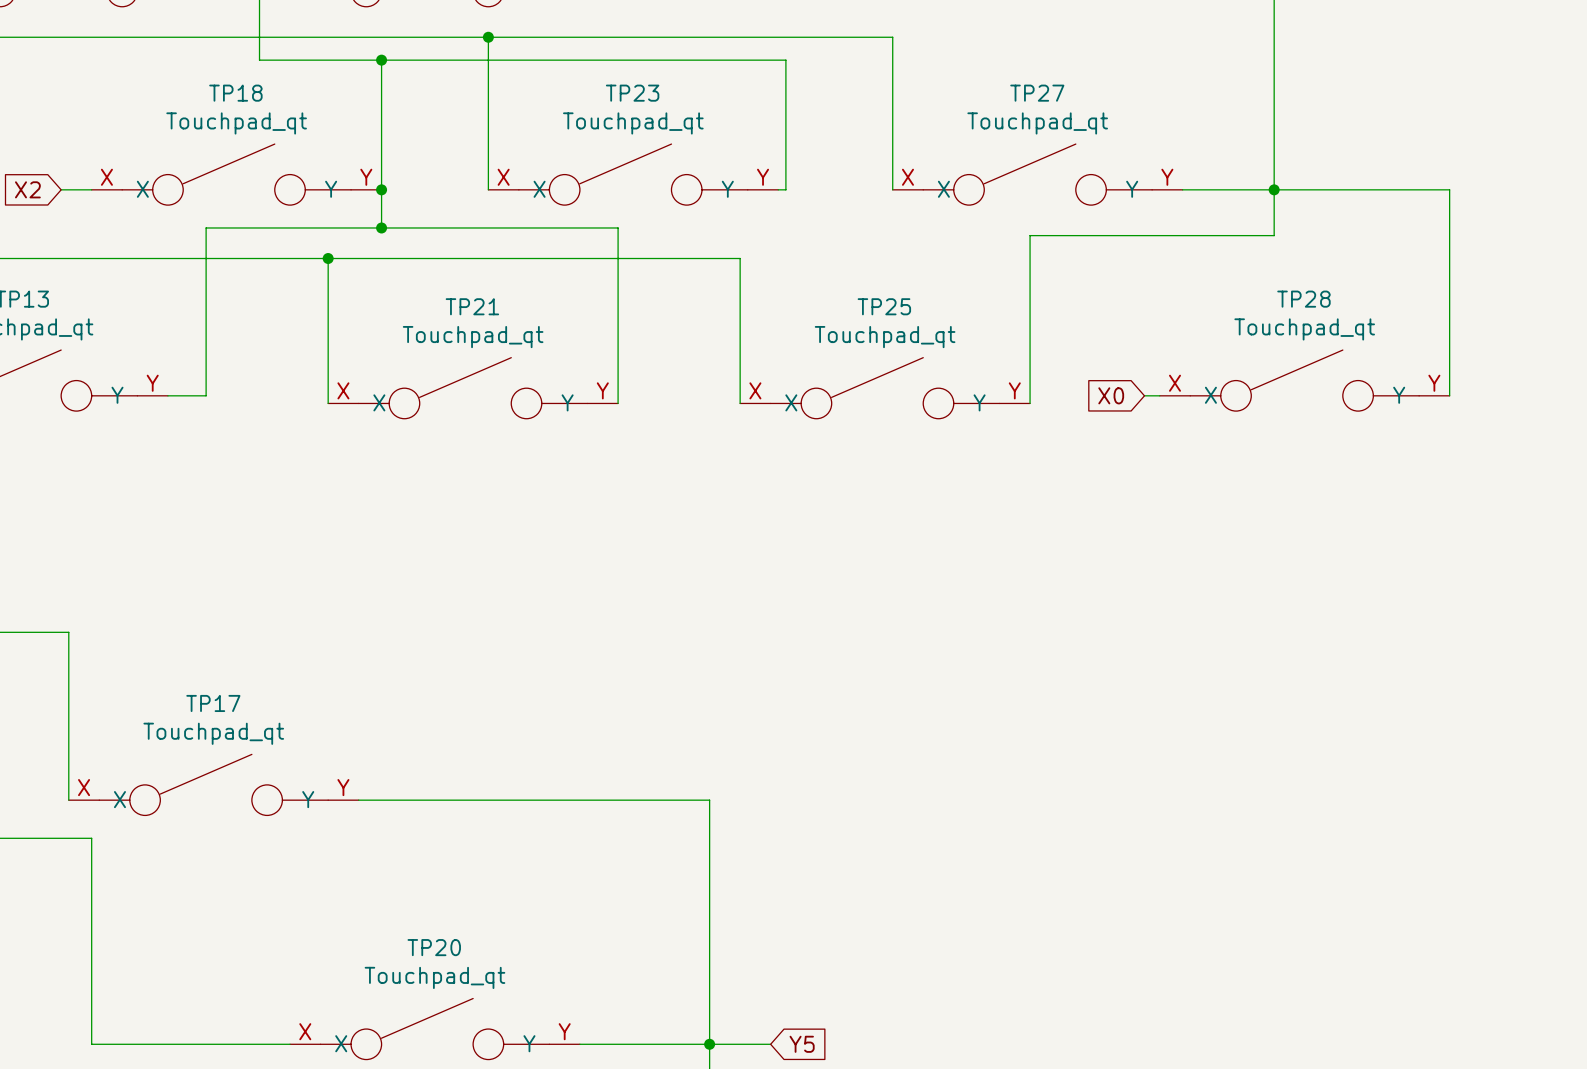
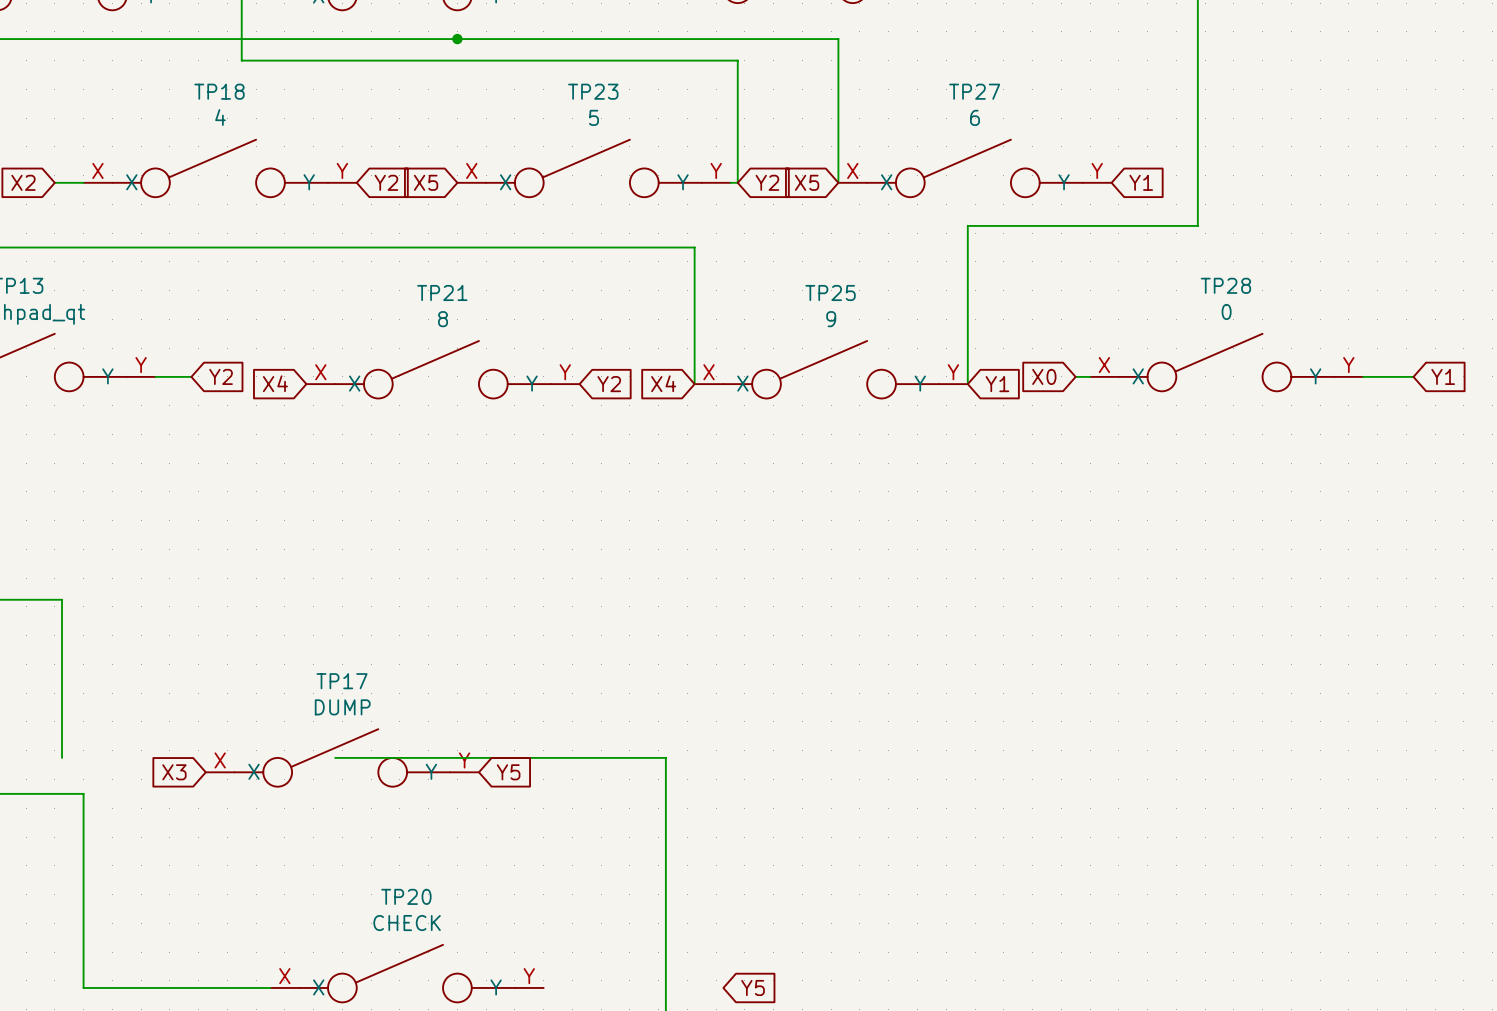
wire: (488, 37) (488, 189) -> none
wire: (381, 60) (381, 227) -> none
junction: (381, 60) -> none
TP18 value: Touchpad_qt (236, 123) -> 4 (220, 117)
TP23 value: Touchpad_qt (633, 123) -> 5 (593, 117)
TP27 value: Touchpad_qt (1037, 123) -> 6 (975, 117)
junction: (381, 189) -> none
global label: none -> Y2 (386, 182)
global label: none -> X5 (426, 182)
global label: none -> Y2 (767, 182)
global label: none -> X5 (807, 182)
wire: (1182, 189) (1449, 189) (1449, 395) -> (1413, 376) (1363, 376)
global label: none -> Y1 (1141, 182)
junction: (1274, 189) -> none
junction: (381, 227) -> none
wire: (328, 258) (328, 403) -> none
junction: (328, 258) -> none
TP28 value: Touchpad_qt (1304, 329) -> 0 (1226, 311)
TP21 value: Touchpad_qt (473, 337) -> 8 (443, 319)
TP25 value: Touchpad_qt (885, 337) -> 9 (831, 319)
wire: (206, 395) (206, 227) (618, 227) (618, 403) -> none
global label: none -> Y2 (221, 376)
global label: none -> Y1 (1443, 376)
global label: none -> X4 (275, 383)
global label: none -> Y2 (609, 384)
global label: none -> X4 (663, 383)
global label: none -> Y1 (997, 384)
TP17 value: Touchpad_qt (213, 733) -> DUMP (342, 707)
TP17 position: (213, 784) -> (342, 757)
global label: none -> X3 (174, 772)
global label: none -> Y5 (508, 772)
TP20 value: Touchpad_qt (434, 977) -> CHECK (407, 923)
wire: (579, 1044) (770, 1044) -> none
junction: (709, 1044) -> none

